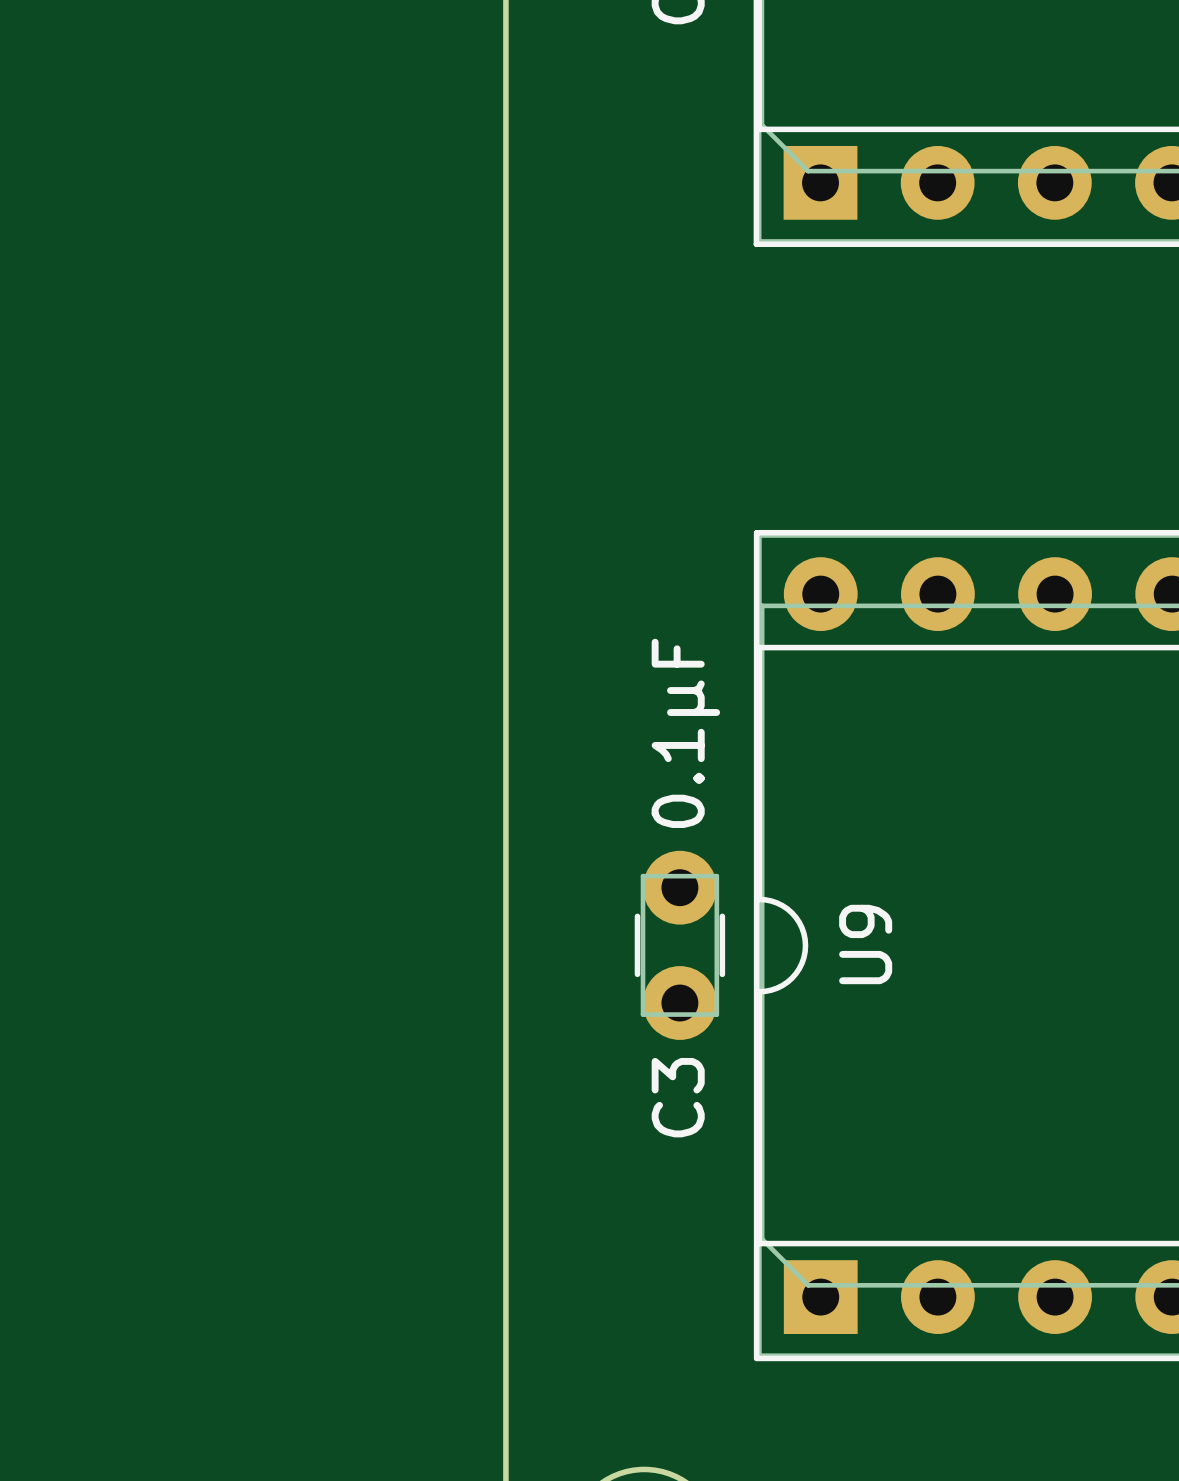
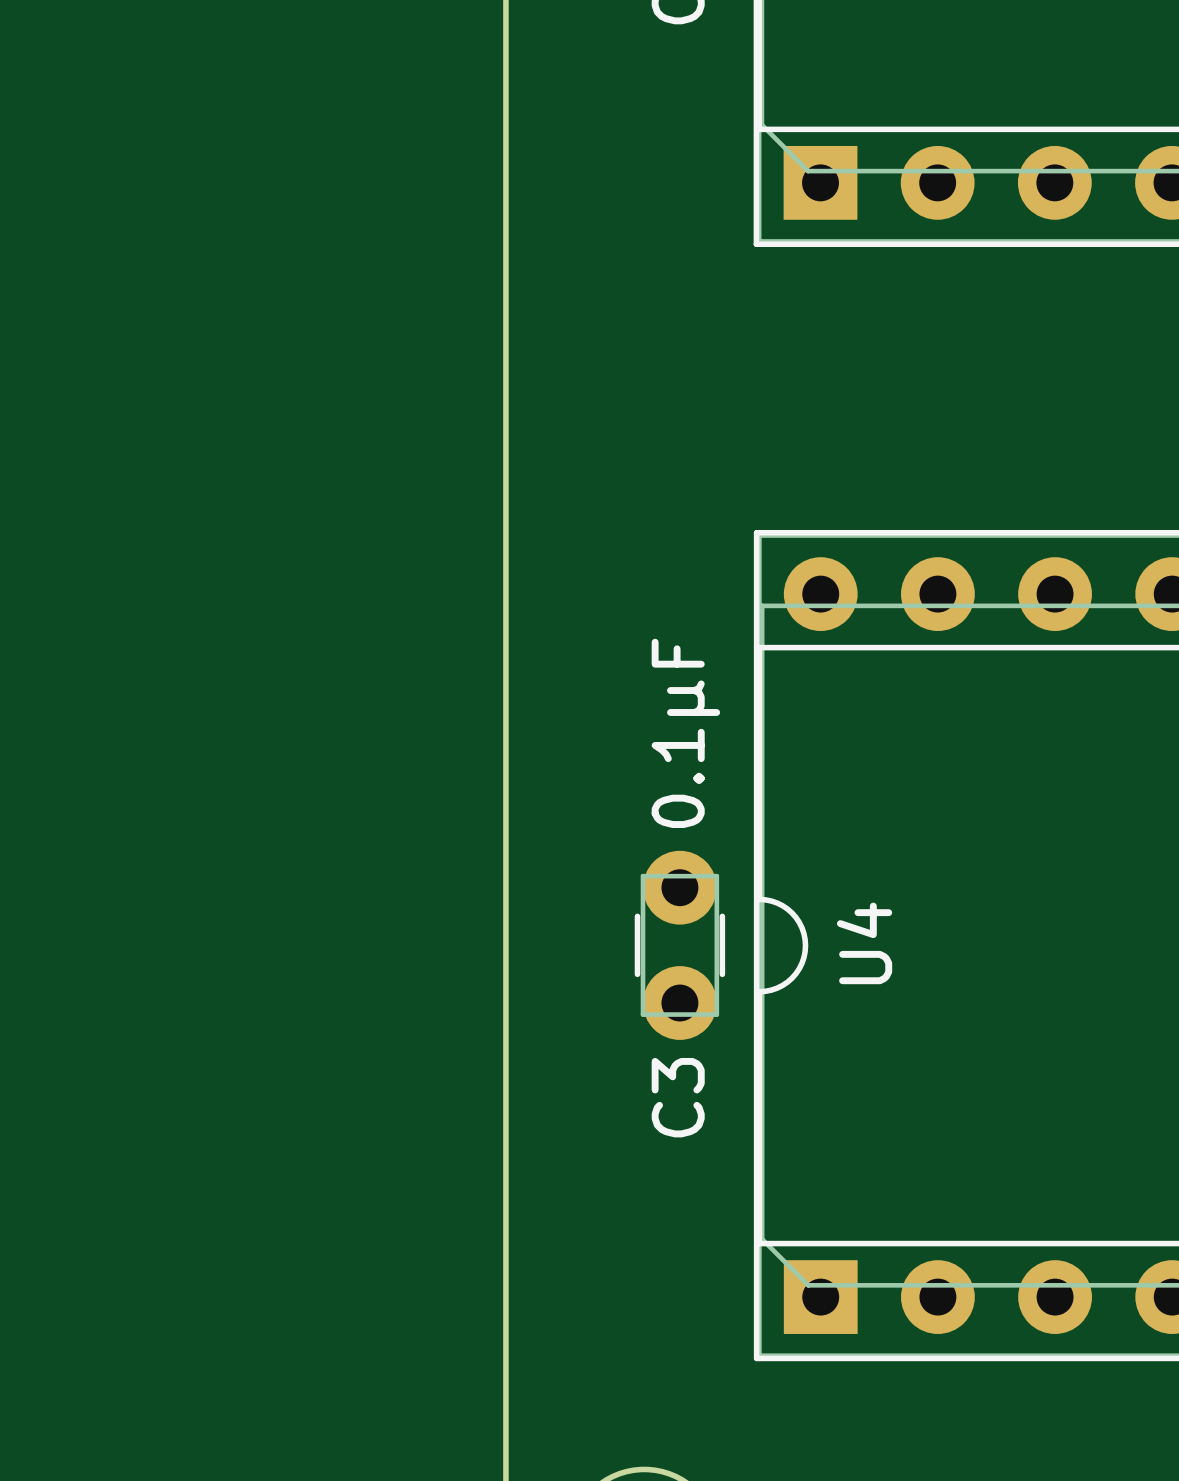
U9 name: U9 (865, 944) -> U4 (864, 943)

